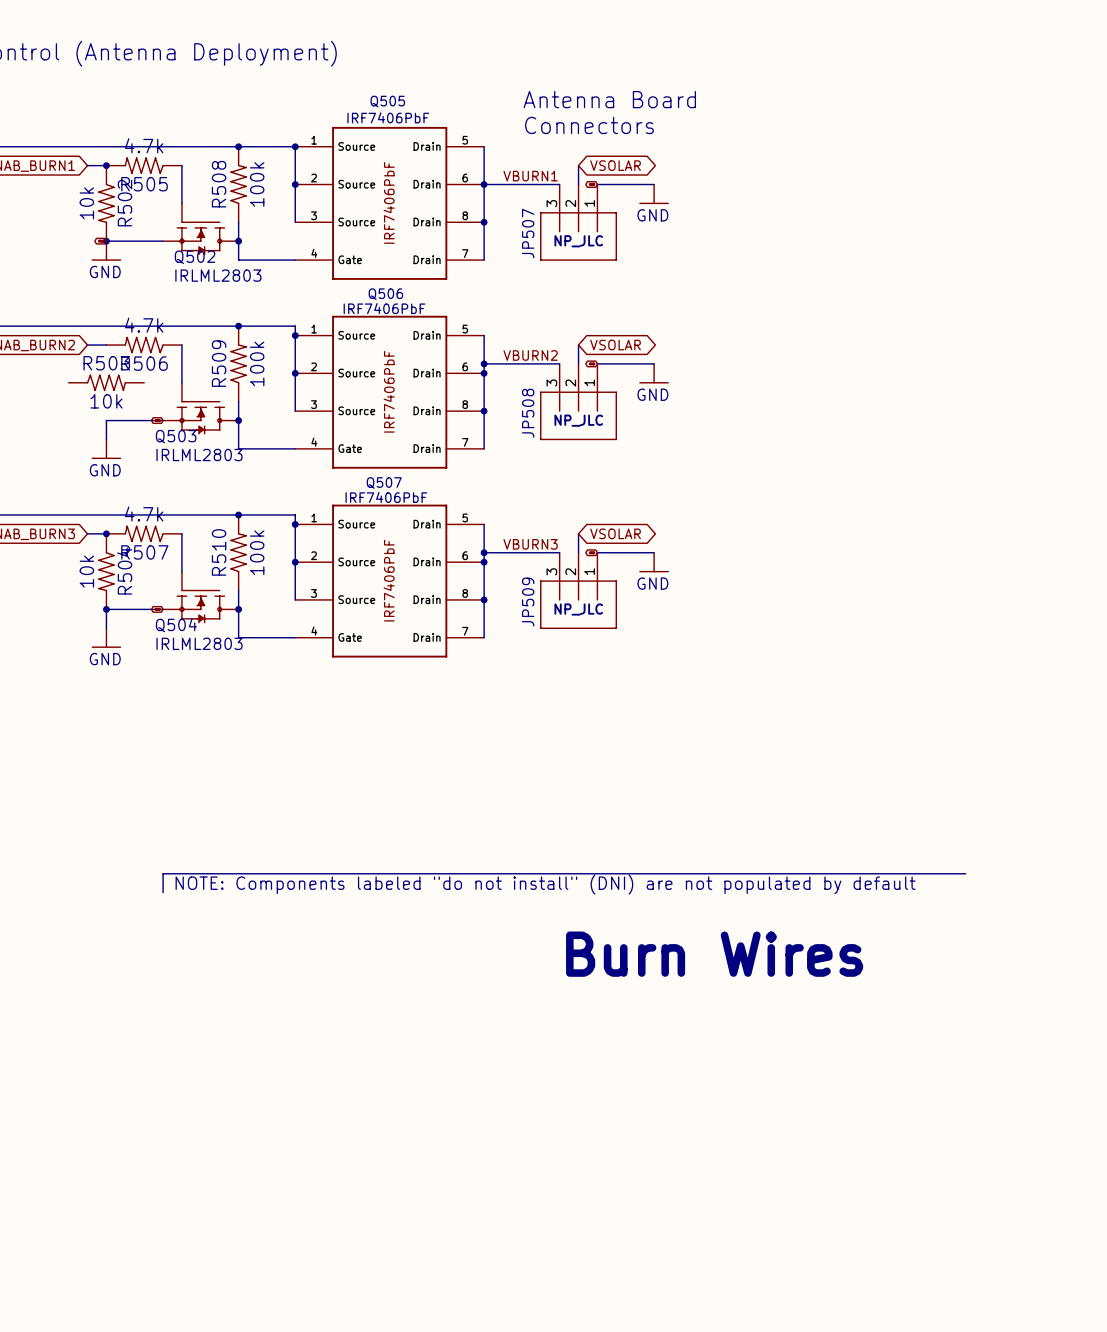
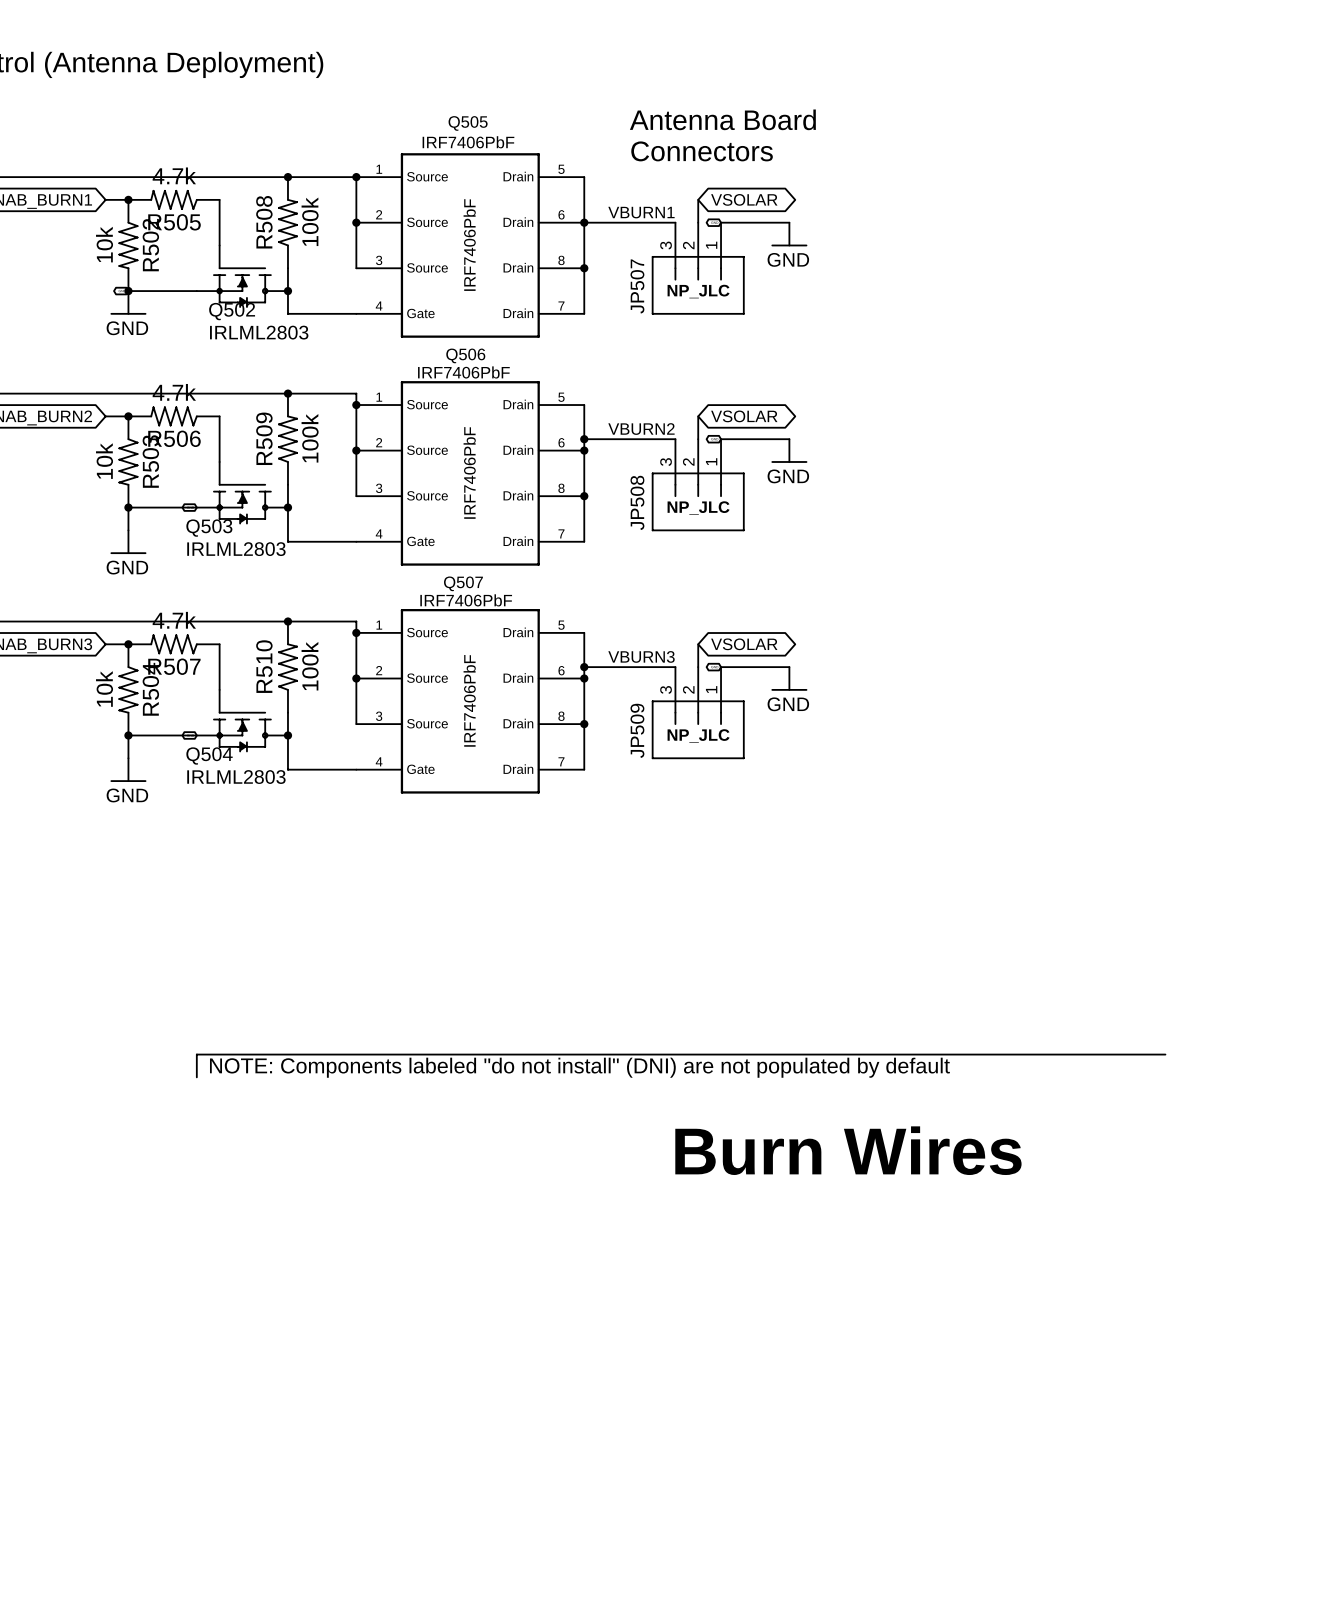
junction: none -> (128, 416)
R503 rotation: 0° (106, 382) -> 90° clockwise (128, 461)
junction: none -> (128, 507)

